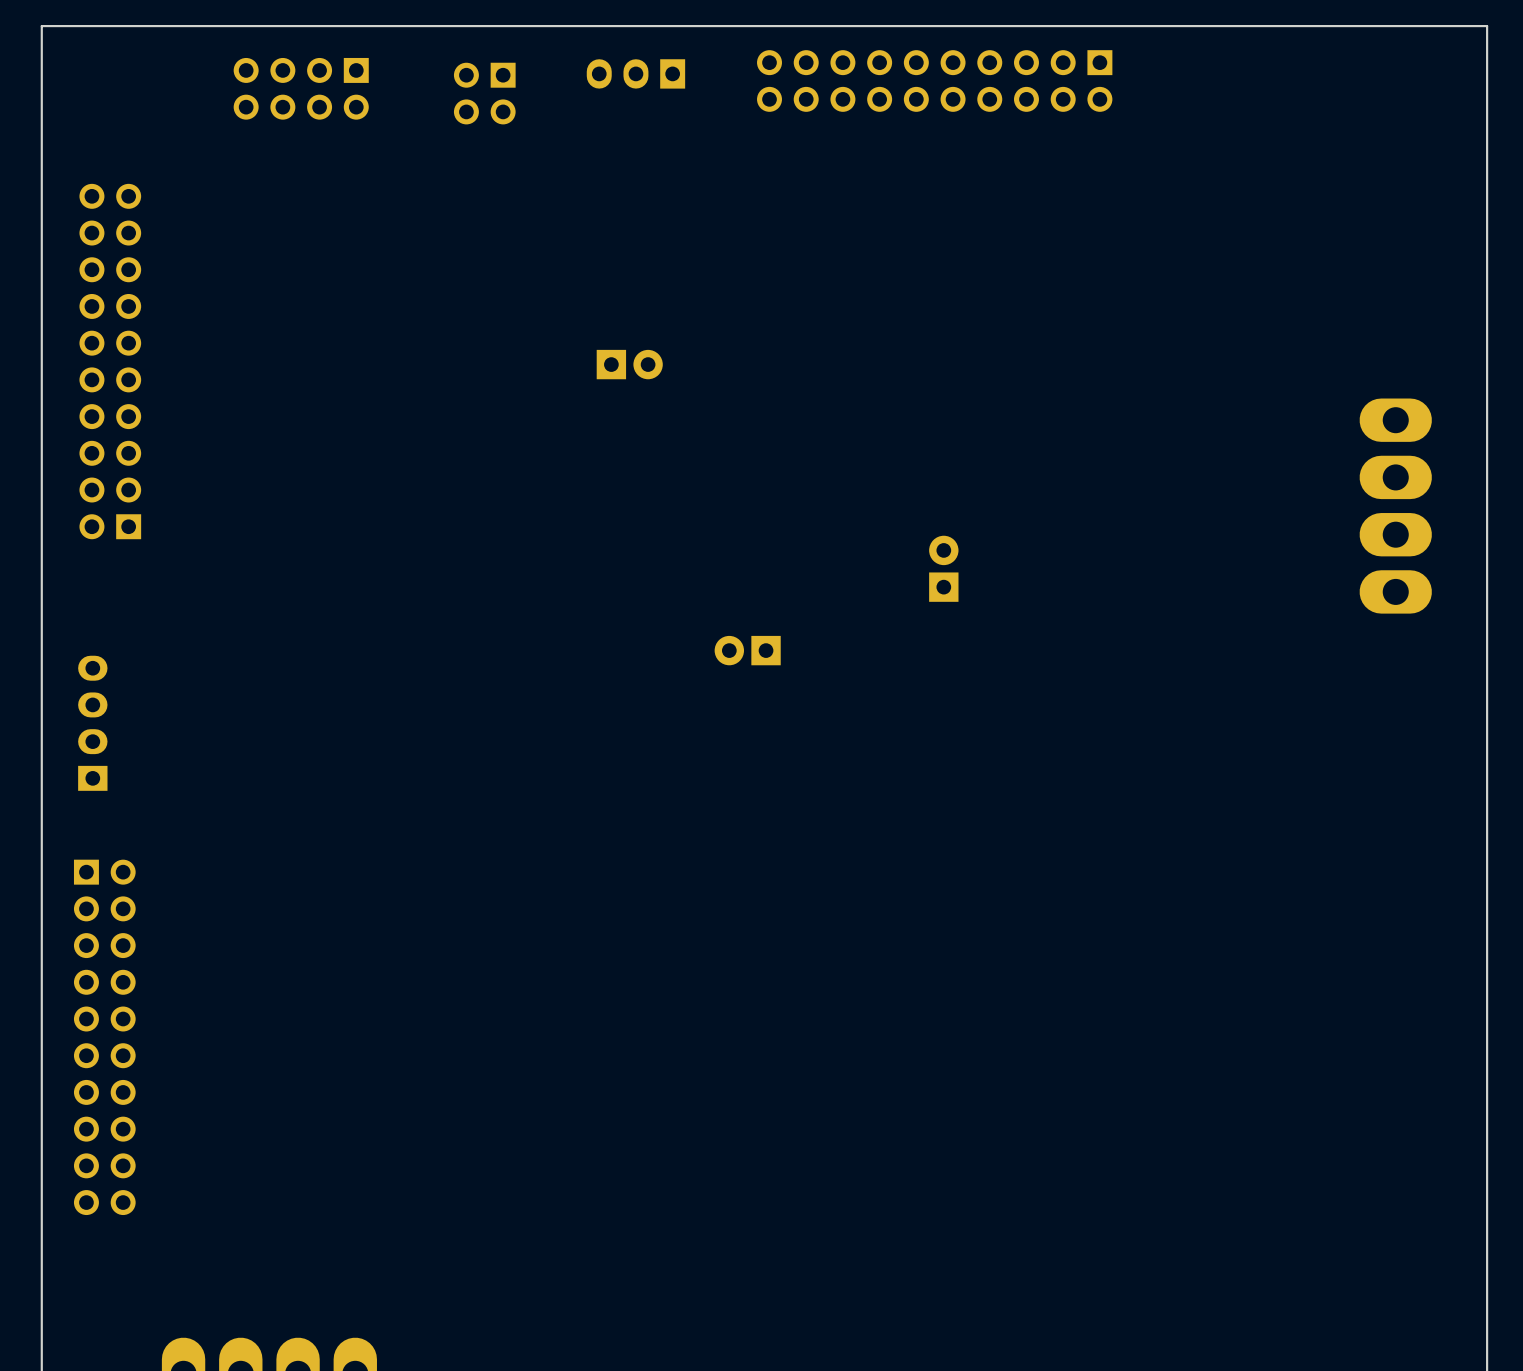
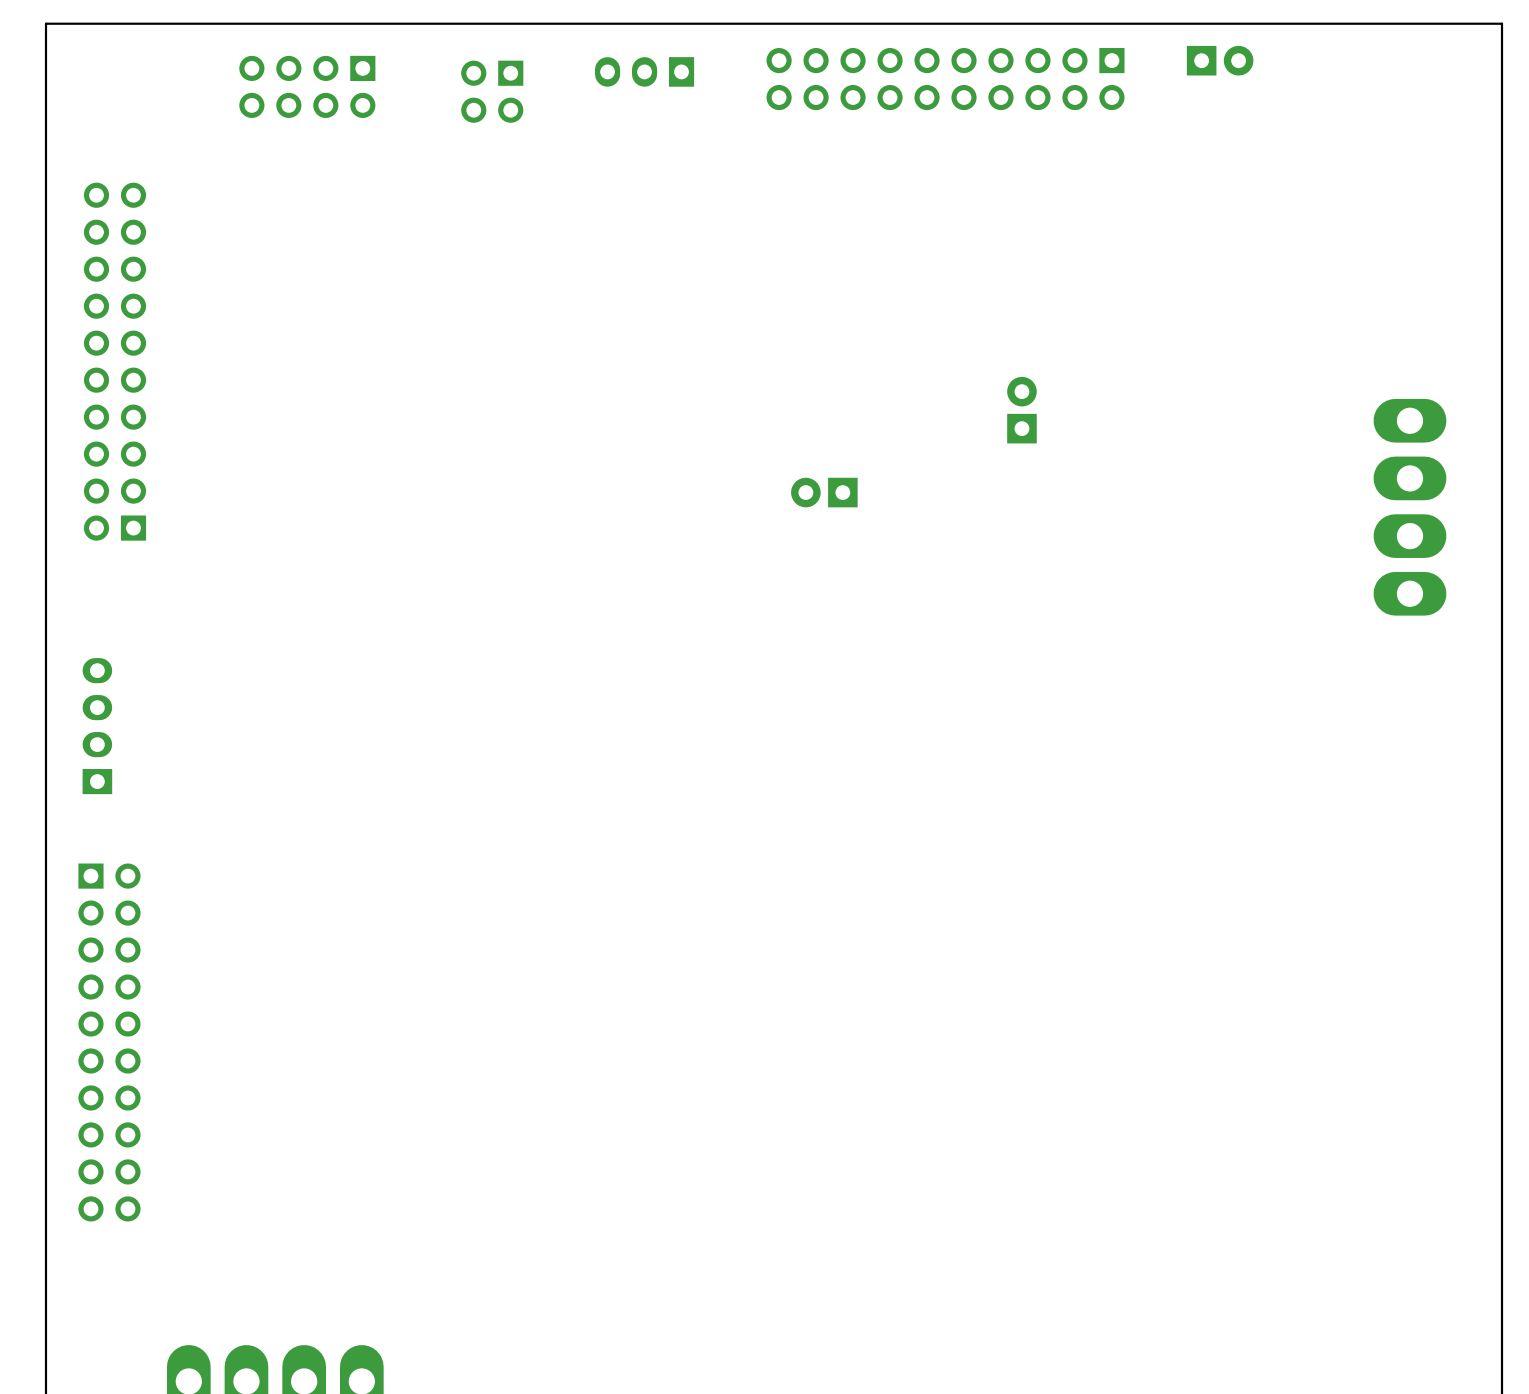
part: none -> (1220, 60)
part: (629, 364) -> none
part: none -> (1021, 410)
part: none -> (824, 492)
part: (943, 568) -> none
part: (747, 650) -> none

